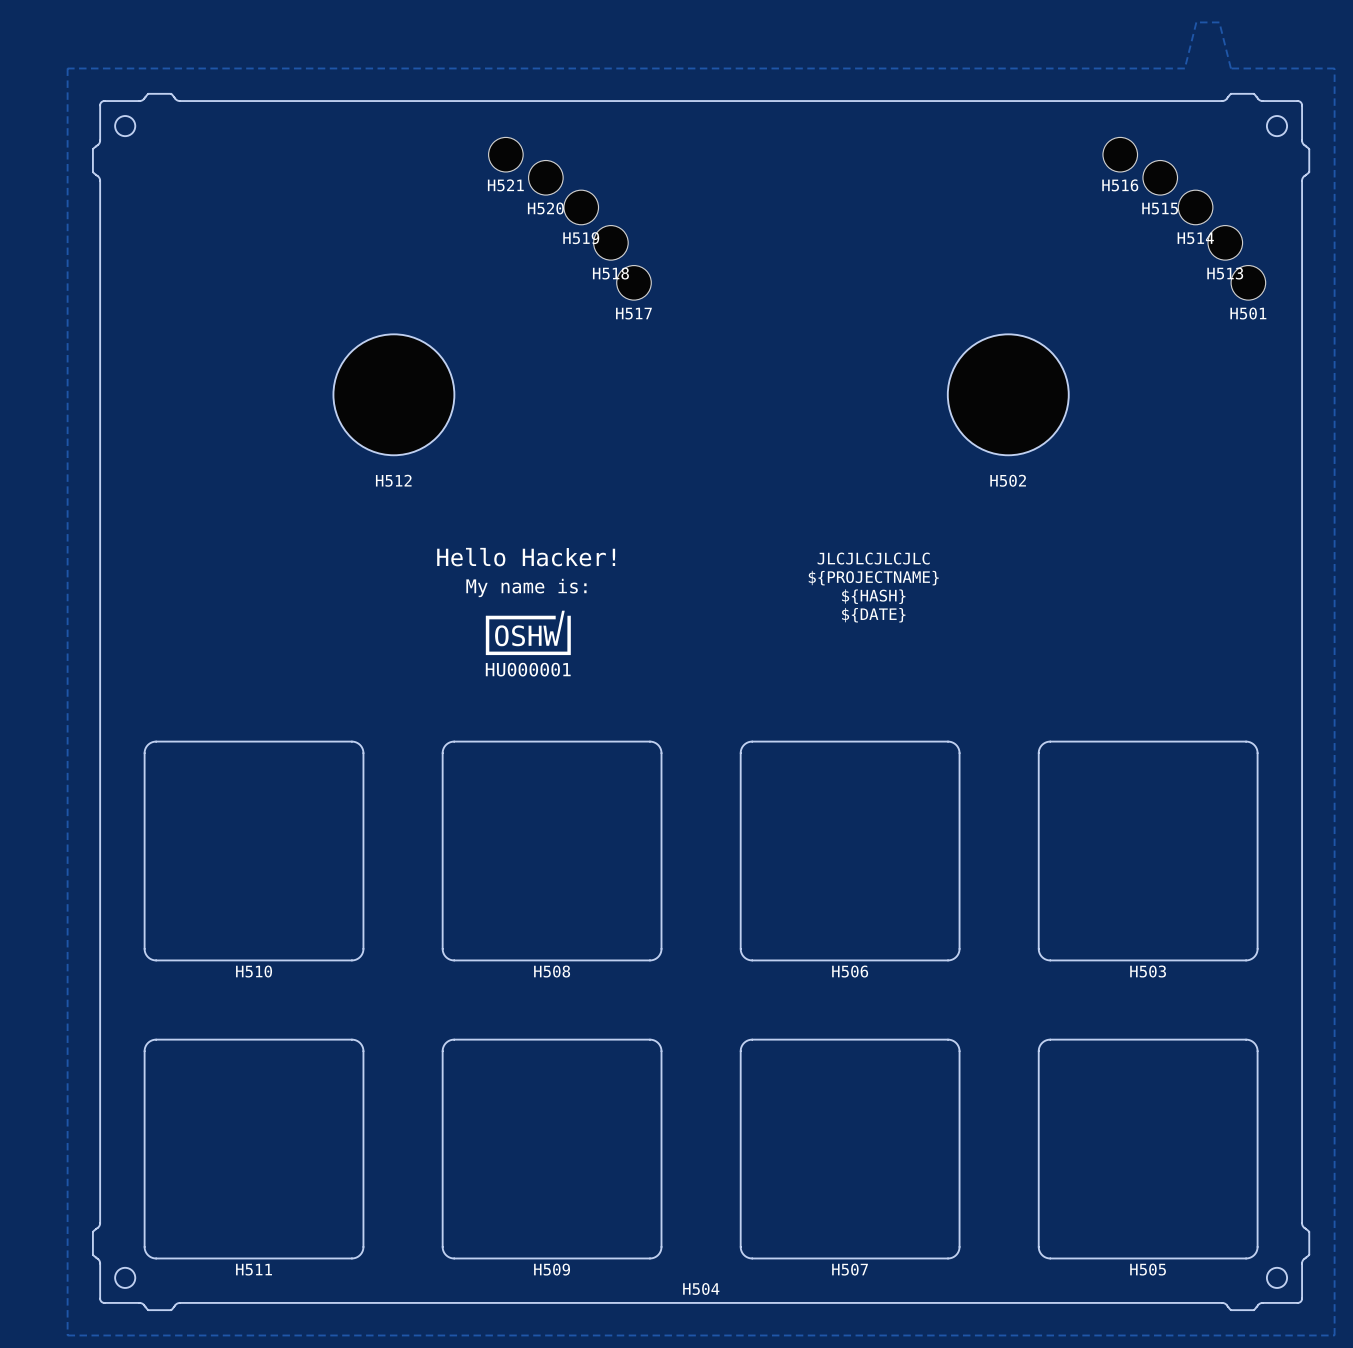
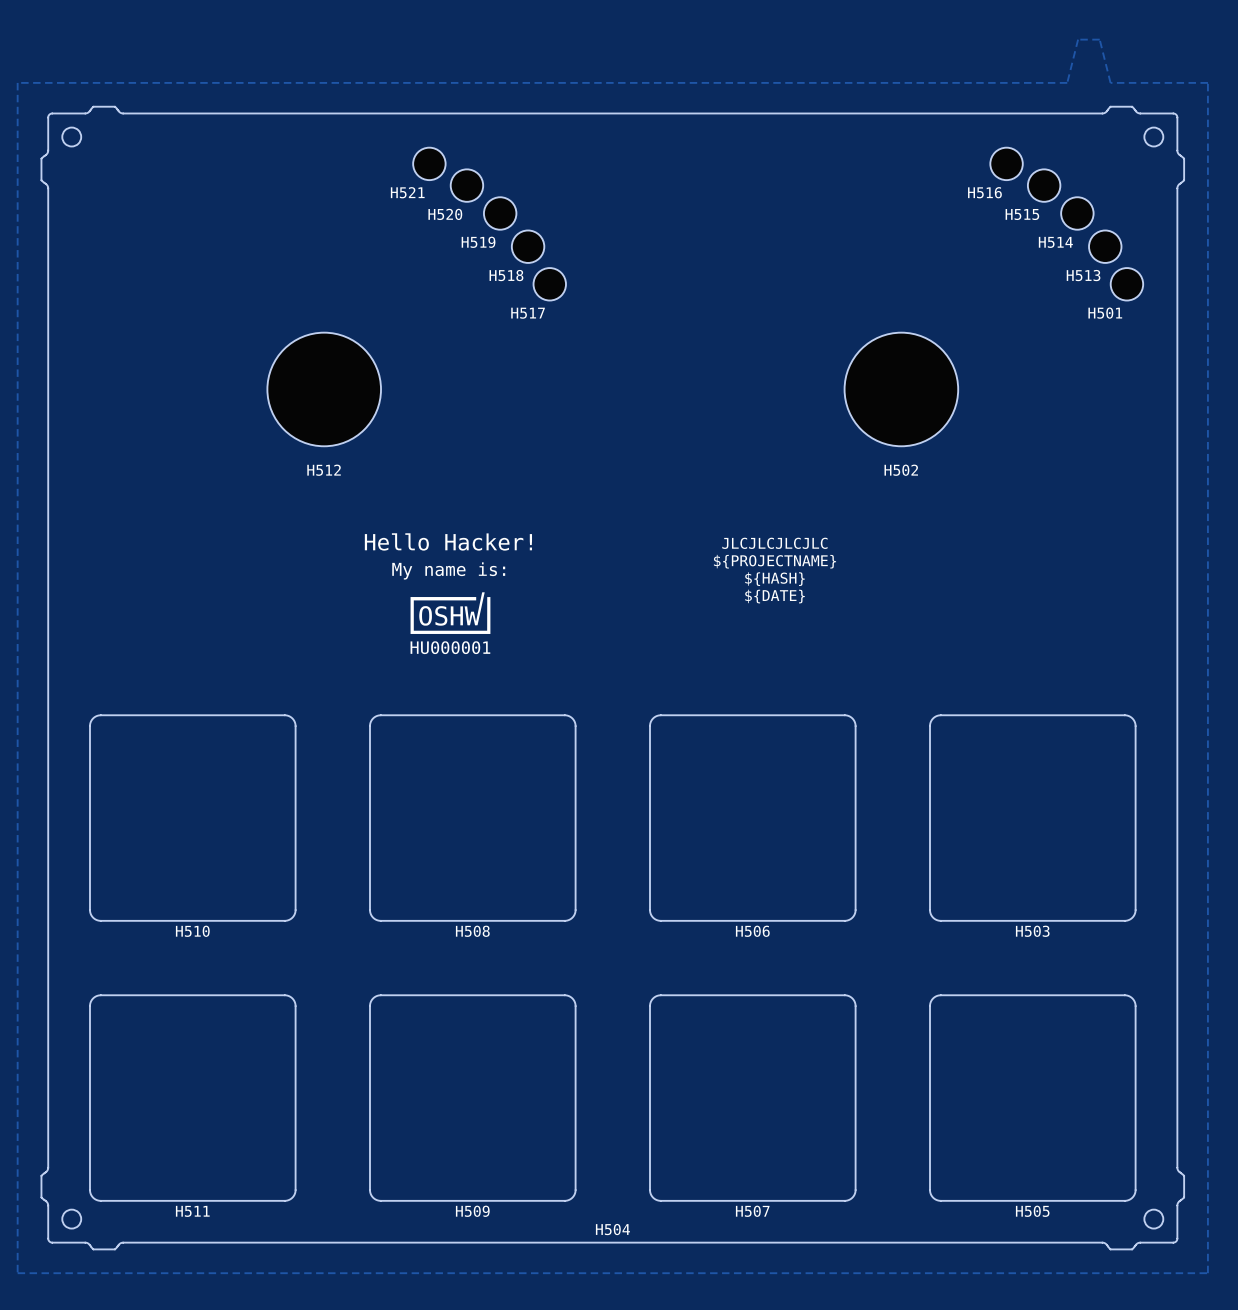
H521 footprint: [488, 136, 524, 173] -> [413, 147, 446, 181]
H516 footprint: [1102, 136, 1139, 173] -> [990, 147, 1023, 181]
H520 footprint: [528, 159, 564, 196] -> [450, 169, 484, 202]
H515 footprint: [1142, 159, 1179, 196] -> [1027, 169, 1061, 202]
H519 footprint: [563, 189, 600, 226] -> [483, 197, 517, 230]
H514 footprint: [1177, 189, 1214, 226] -> [1061, 197, 1094, 230]
H518 footprint: [593, 225, 629, 261] -> [511, 230, 545, 263]
H513 footprint: [1207, 225, 1244, 261] -> [1089, 230, 1122, 263]
H517 footprint: [616, 264, 652, 301] -> [533, 268, 566, 301]
H501 footprint: [1230, 264, 1267, 301] -> [1110, 268, 1144, 301]

